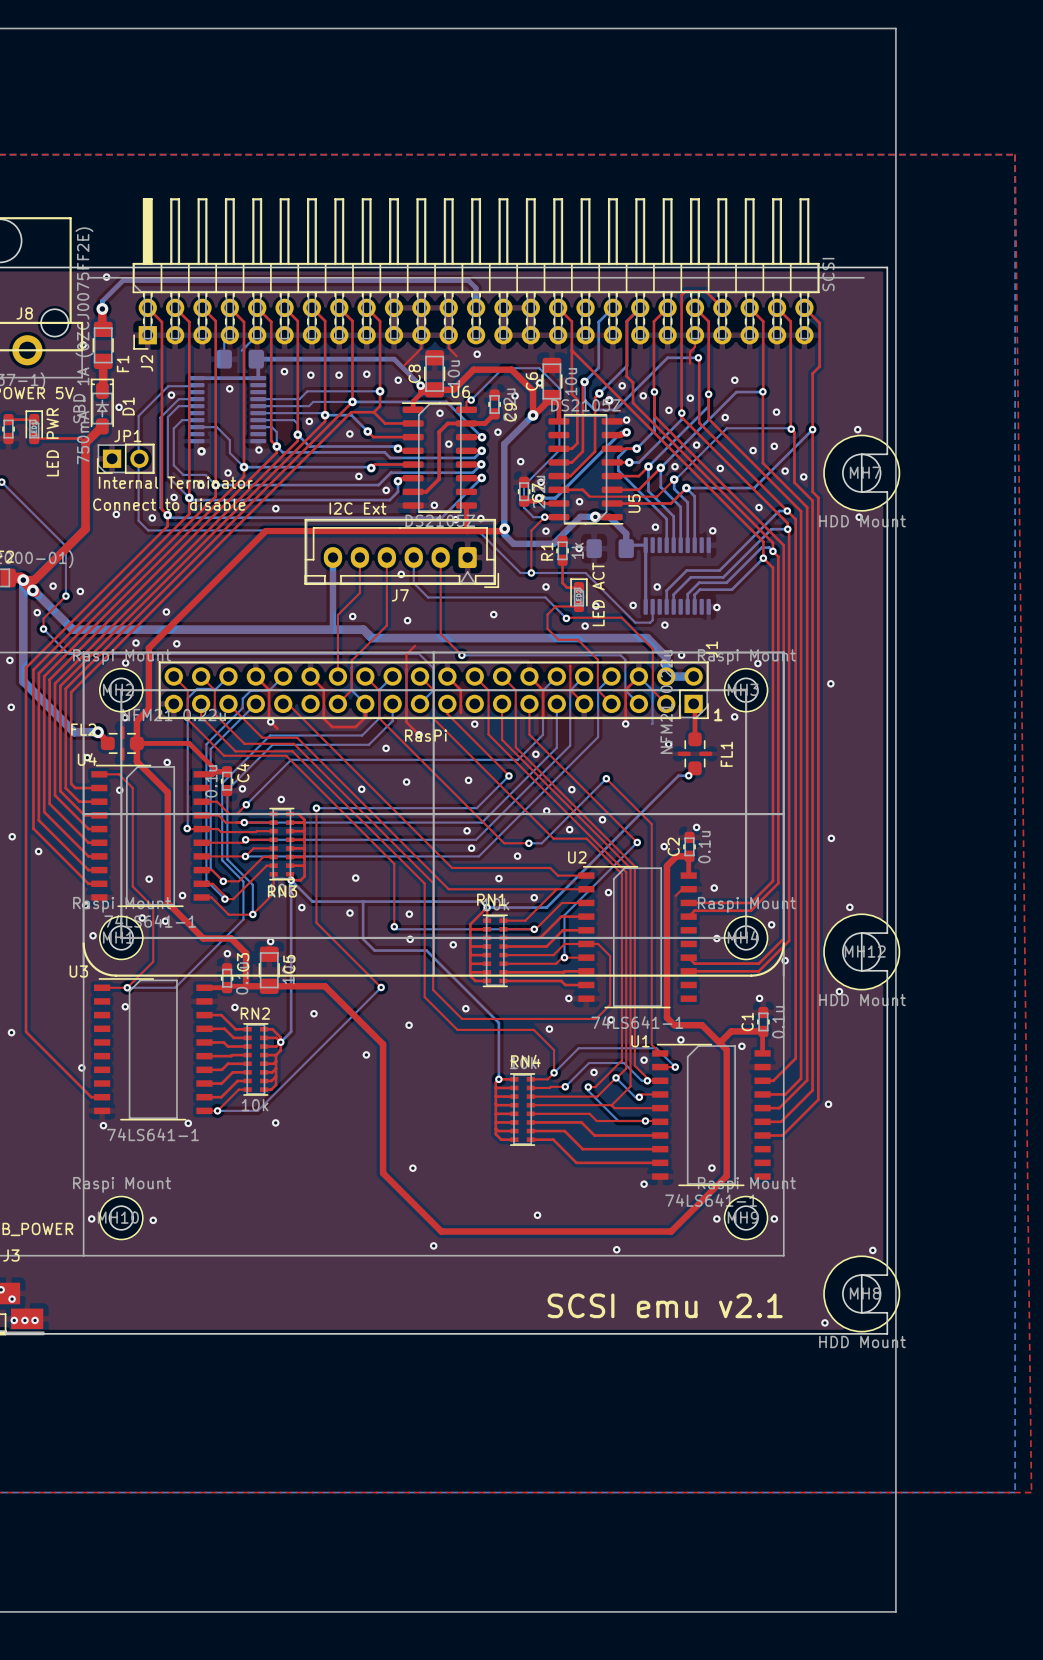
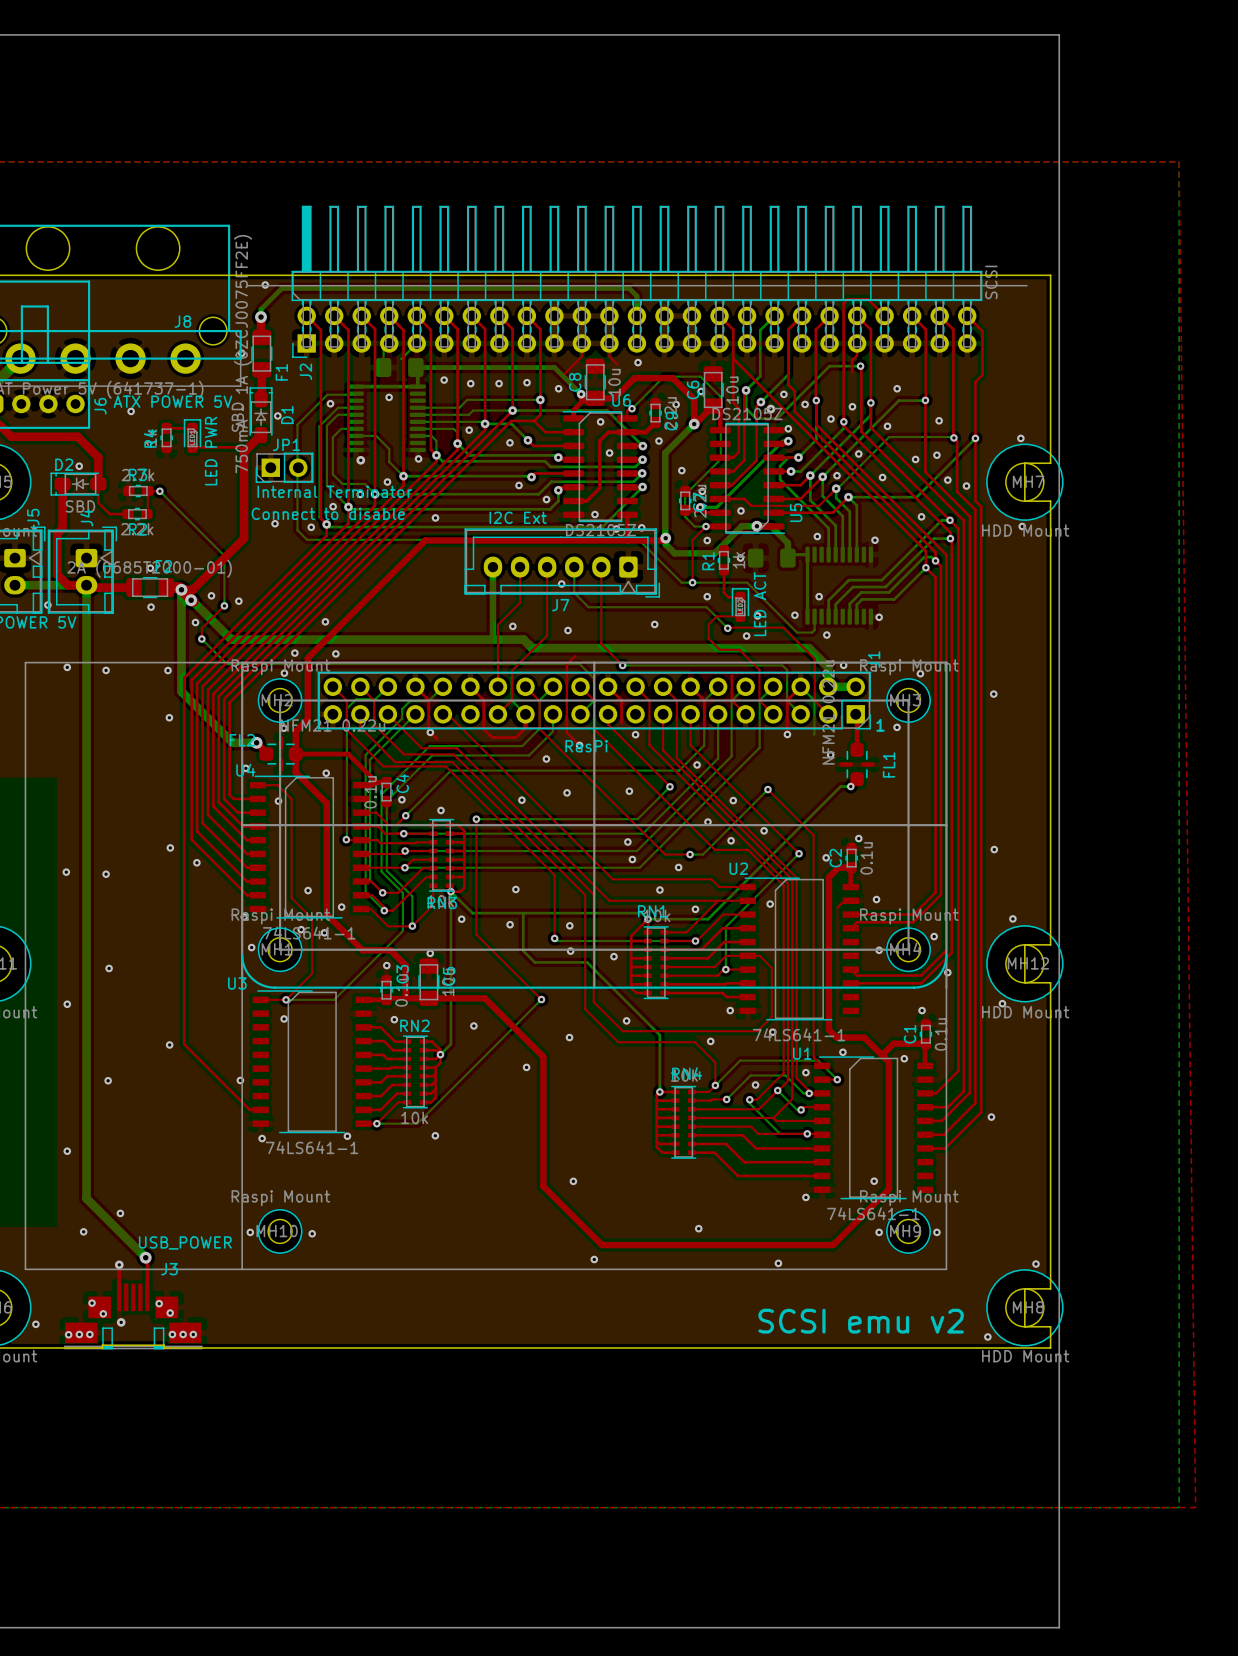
text: SCSI emu v2.1 (665, 1305) -> SCSI emu v2 (861, 1321)

